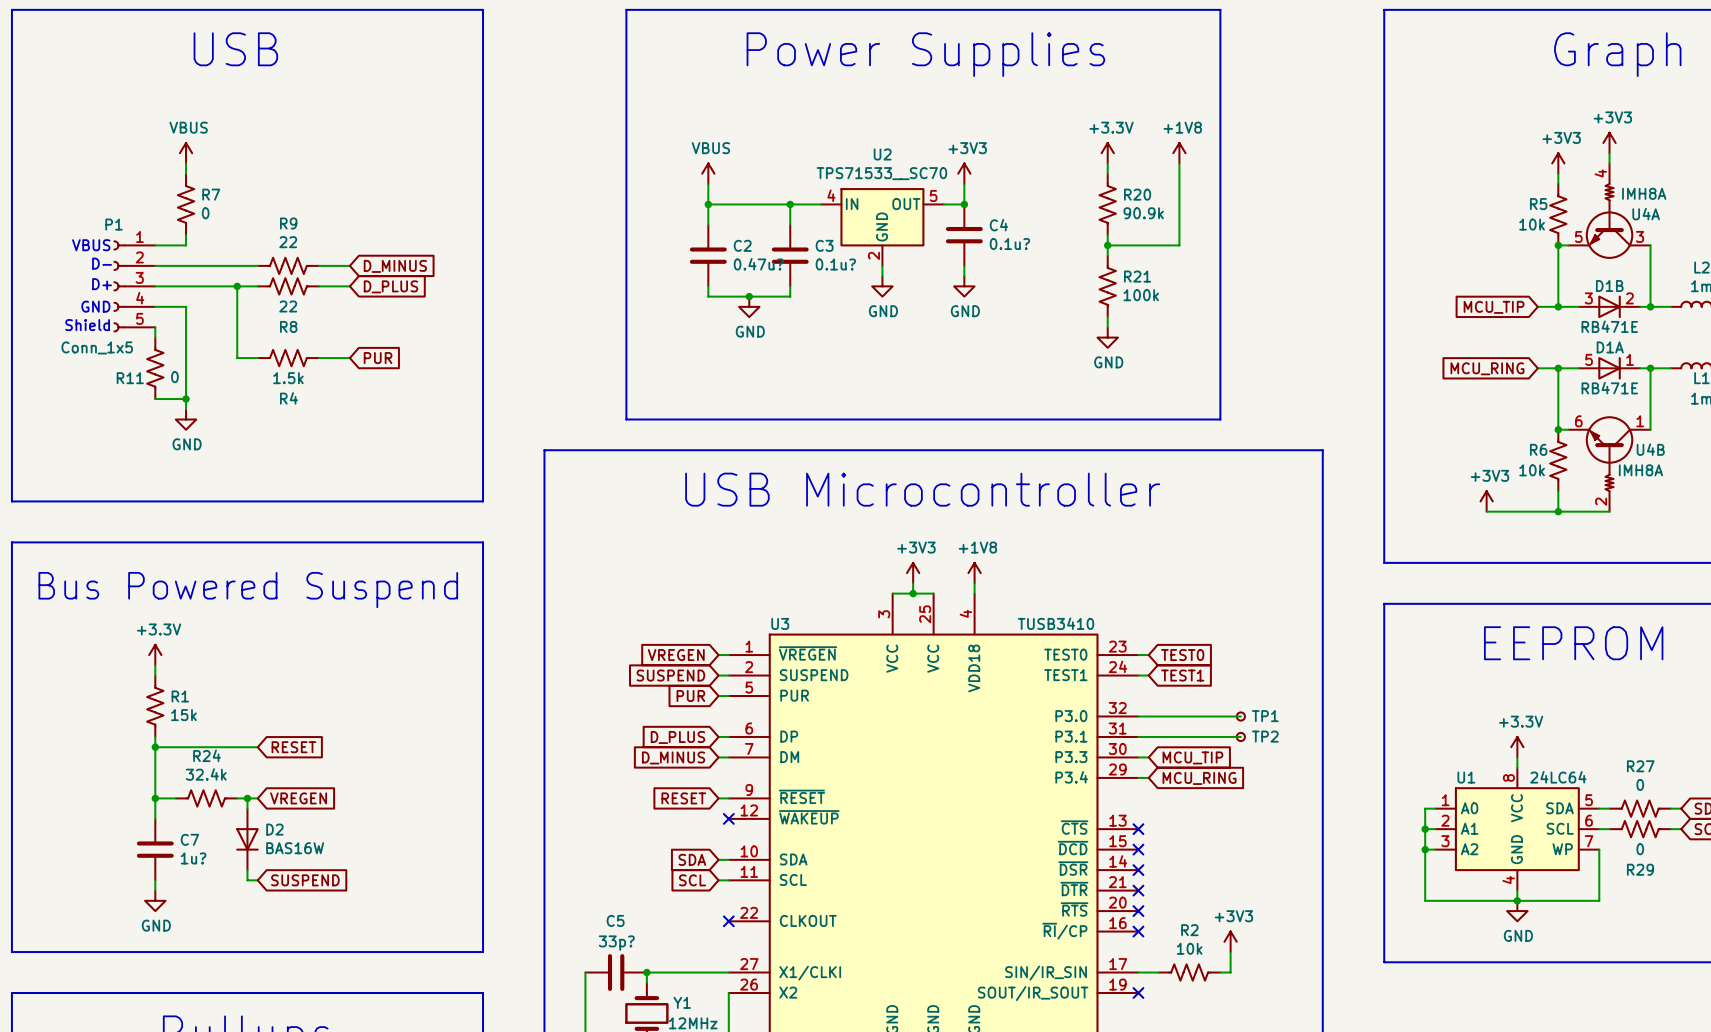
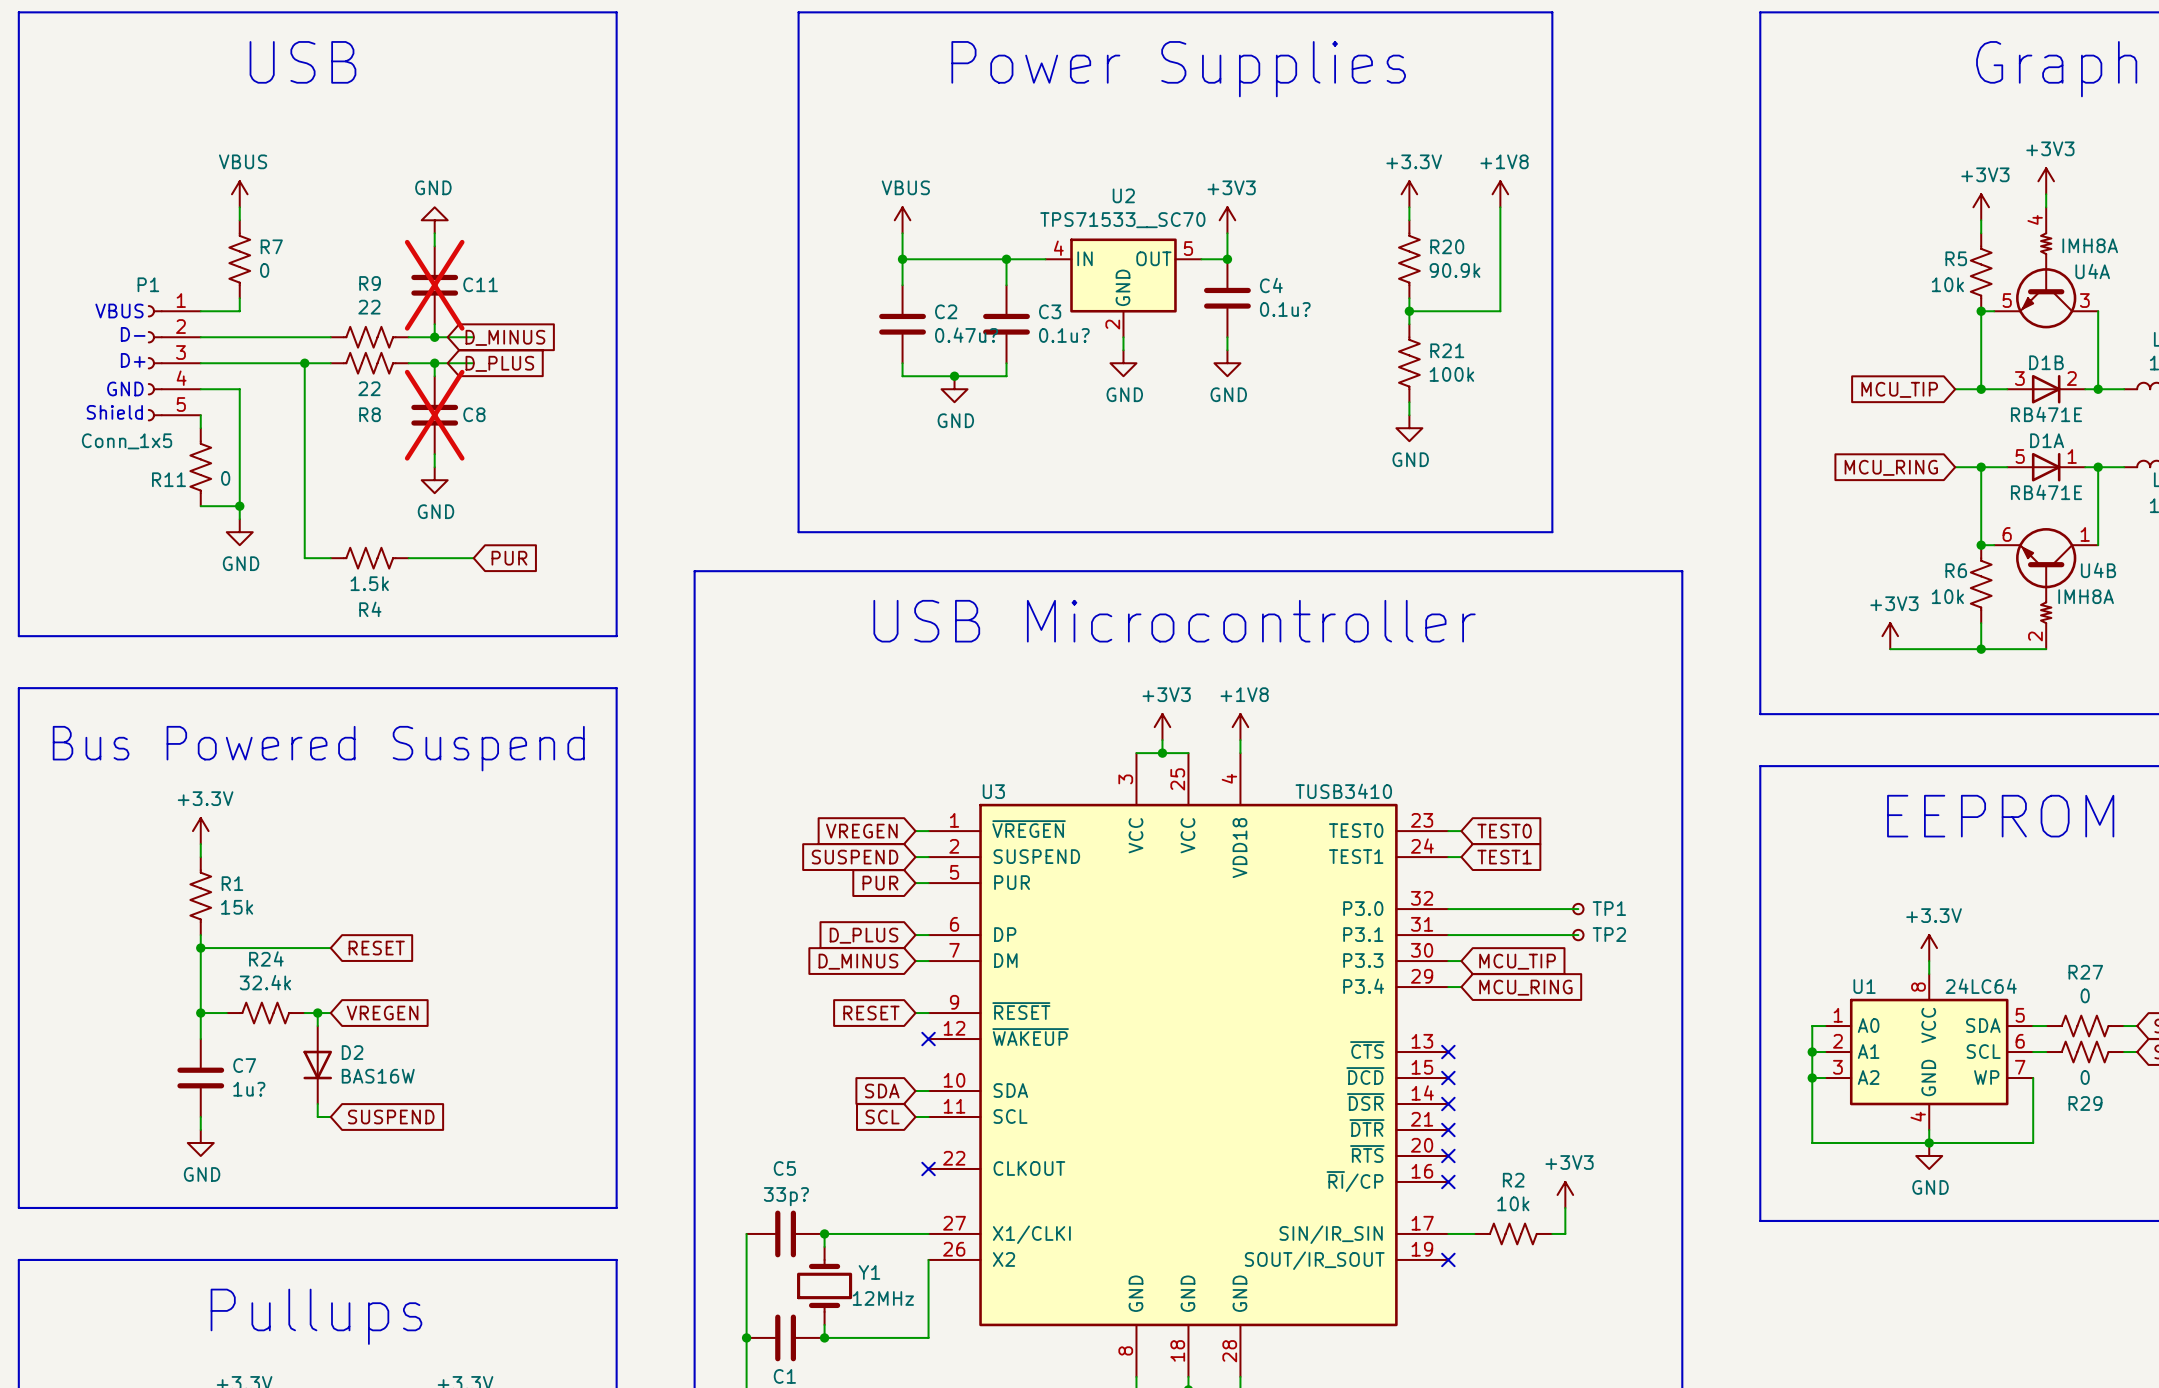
power symbol: none -> GND (434, 220)
wire: none -> (434, 233) (434, 246)
C11: none -> (434, 285)
wire: none -> (434, 324) (434, 337)
junction: none -> (434, 337)
wire: none -> (447, 337) (473, 337)
wire: none -> (434, 363) (434, 376)
junction: none -> (434, 363)
wire: none -> (447, 363) (473, 363)
C8: none -> (434, 415)
wire: (237, 358) (257, 358) -> (304, 454) (304, 558) (330, 558)
R4 position: (288, 358) -> (369, 558)
wire: (319, 358) (349, 358) -> none
wire: none -> (434, 454) (434, 467)
global label position: PUR (378, 358) -> PUR (509, 558)
power symbol: none -> GND (434, 480)
wire: none -> (408, 558) (473, 558)

